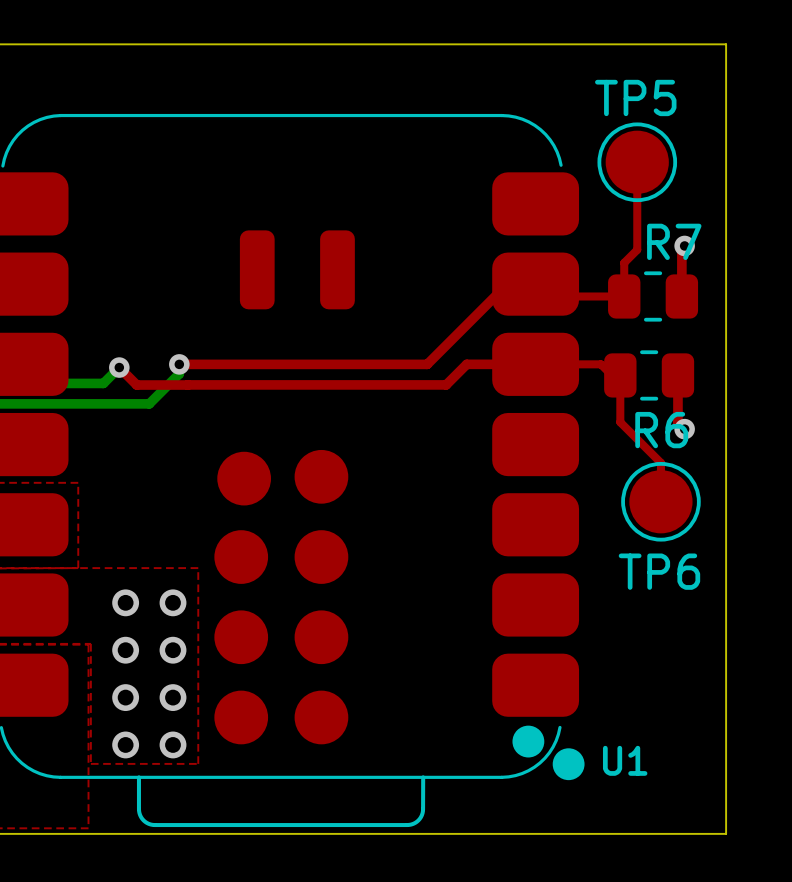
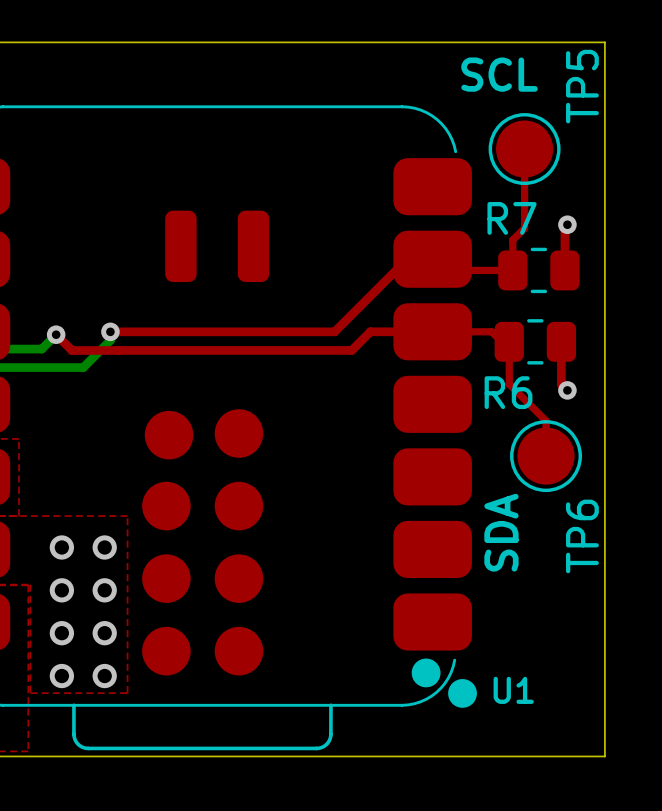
text: none -> SCL (499, 74)
TP5 name rotation: 0° (635, 97) -> 90° counterclockwise (582, 86)
R7 name position: R7 (674, 241) -> R7 (512, 218)
R6 name position: R6 (661, 430) -> R6 (508, 392)
TP6 name rotation: 0° (659, 571) -> 90° counterclockwise (582, 536)
text: none -> SDA (501, 532)

